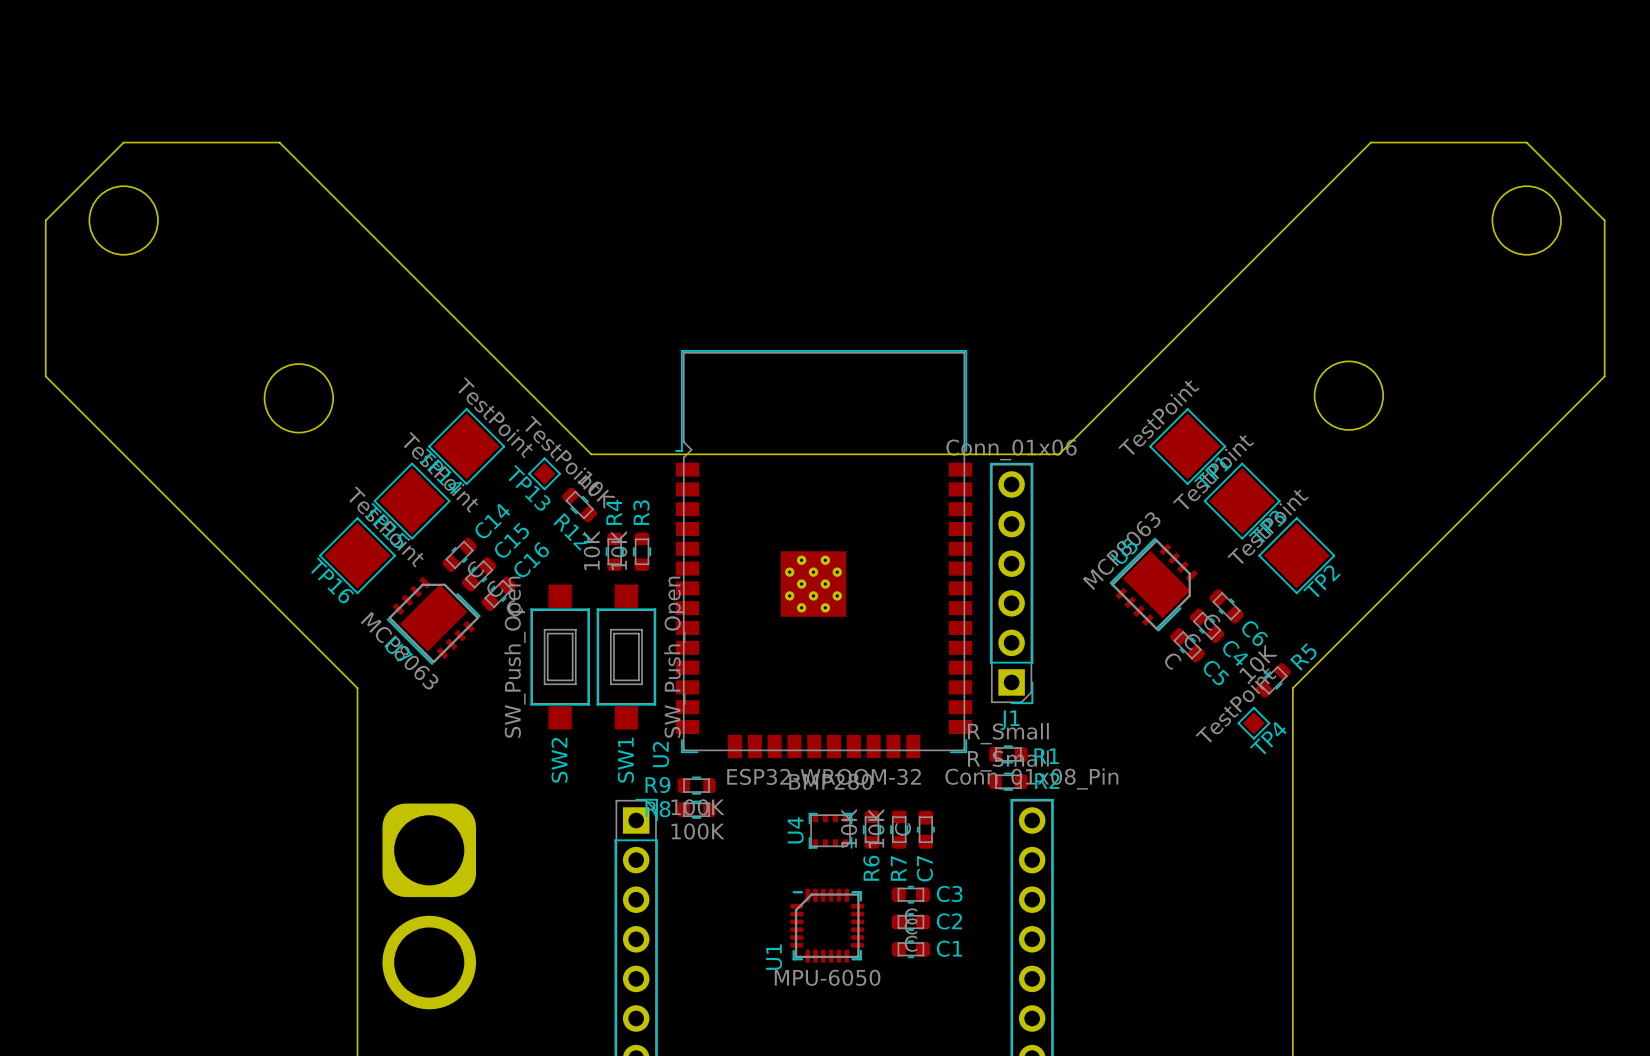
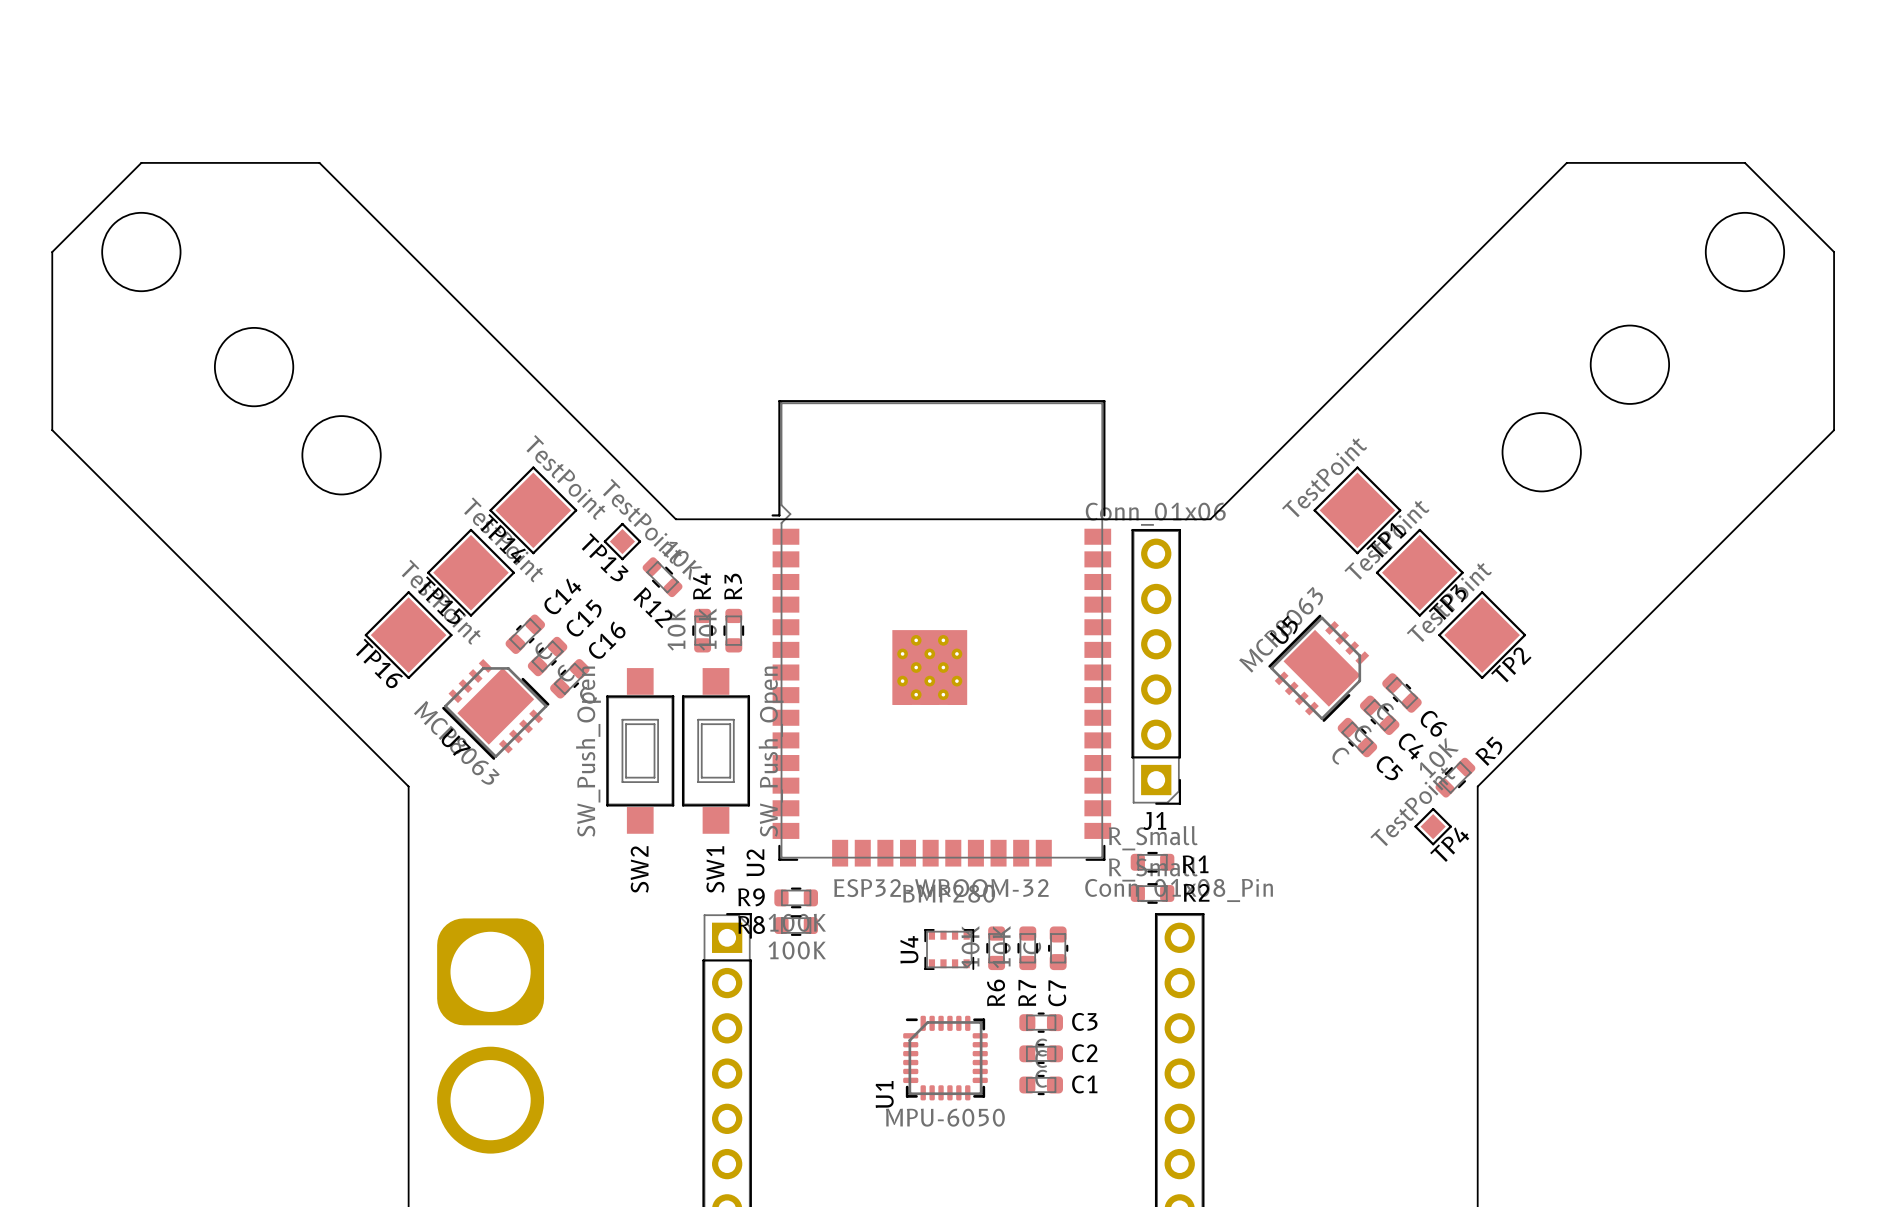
round board edge: none -> [1589, 324, 1671, 405]
round board edge: none -> [213, 326, 295, 408]

